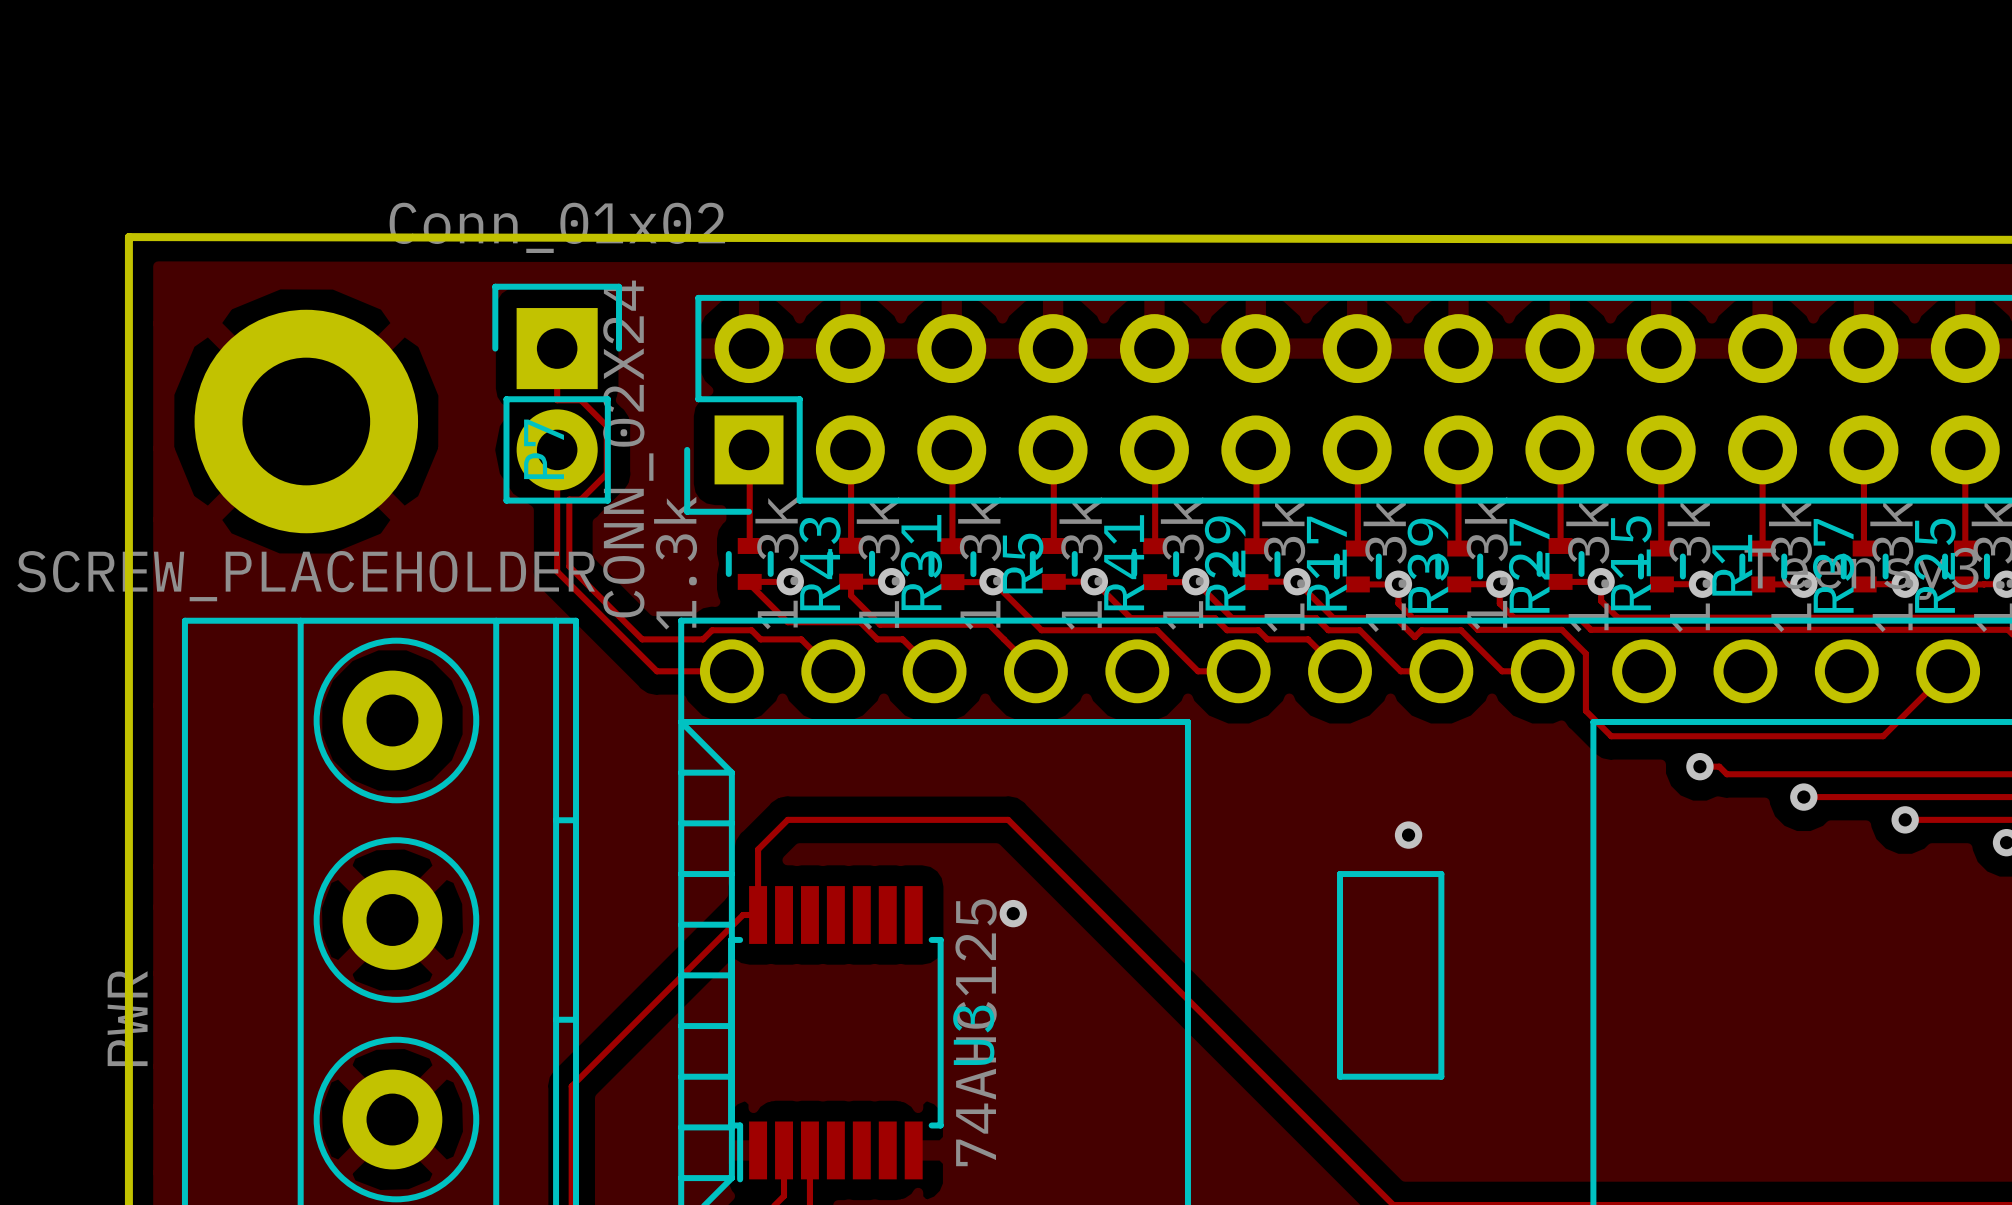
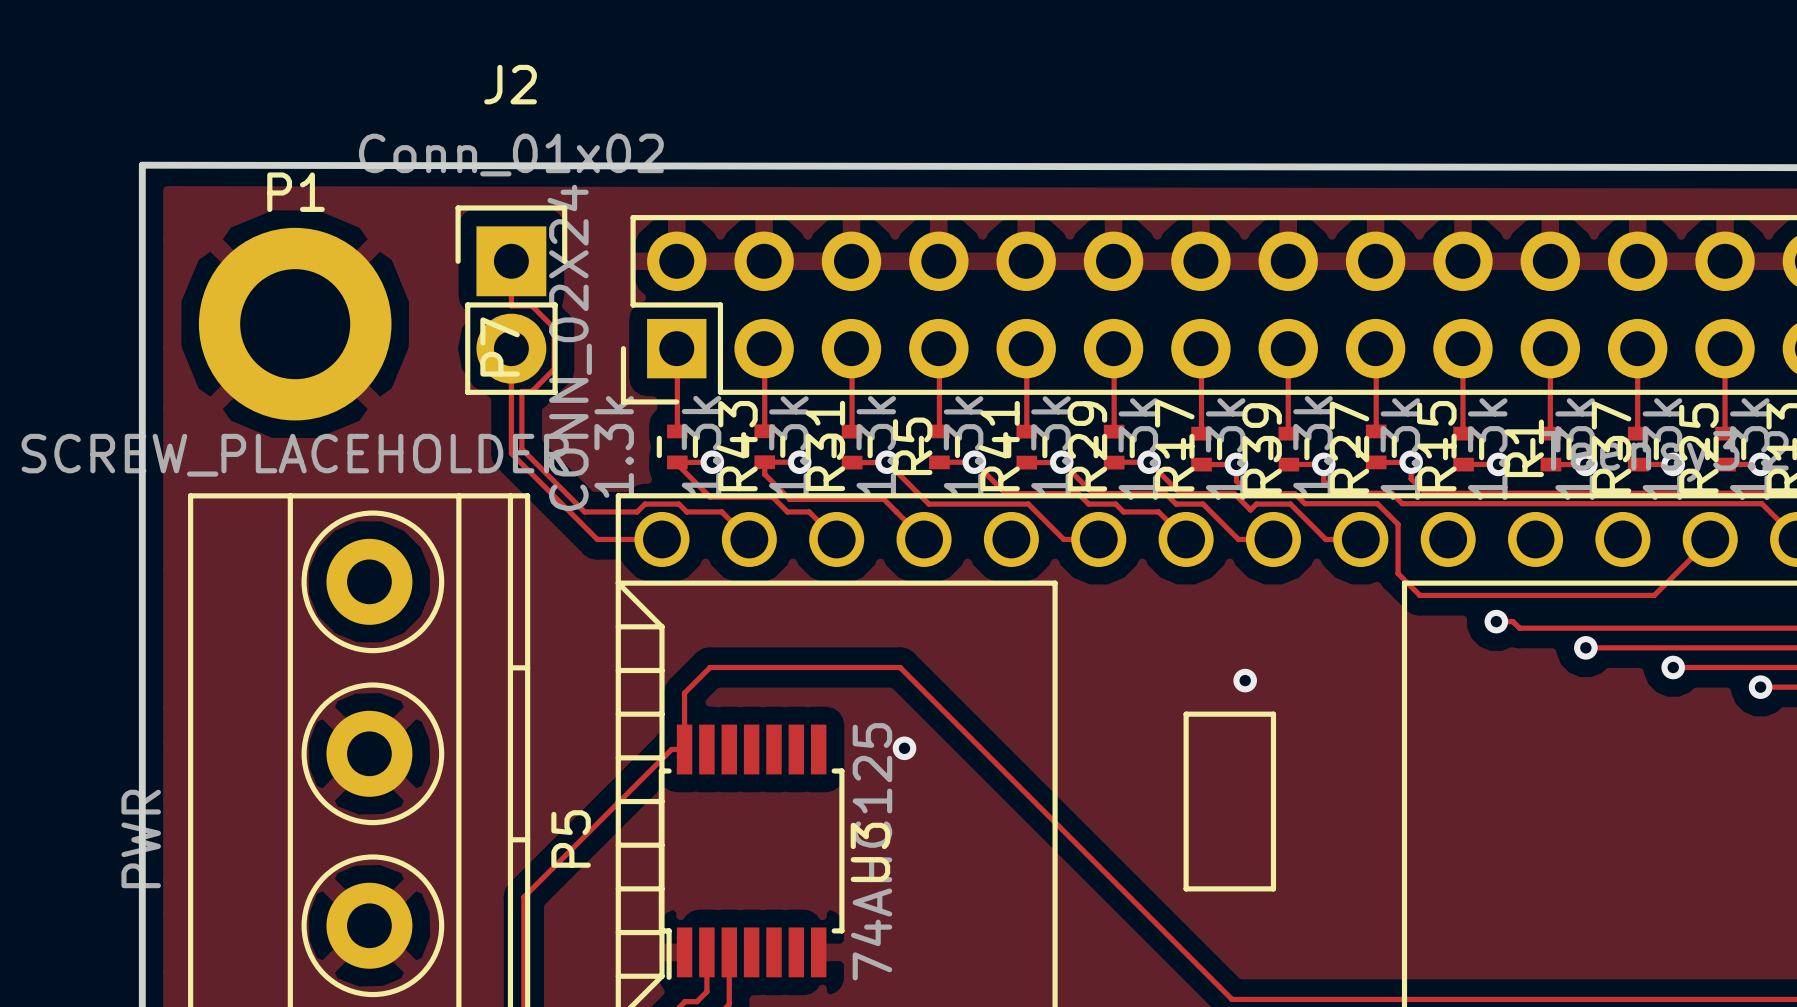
J2 name: none -> J2 (510, 84)
P1 name: none -> P1 (296, 192)
P5 name: none -> P5 (571, 838)

